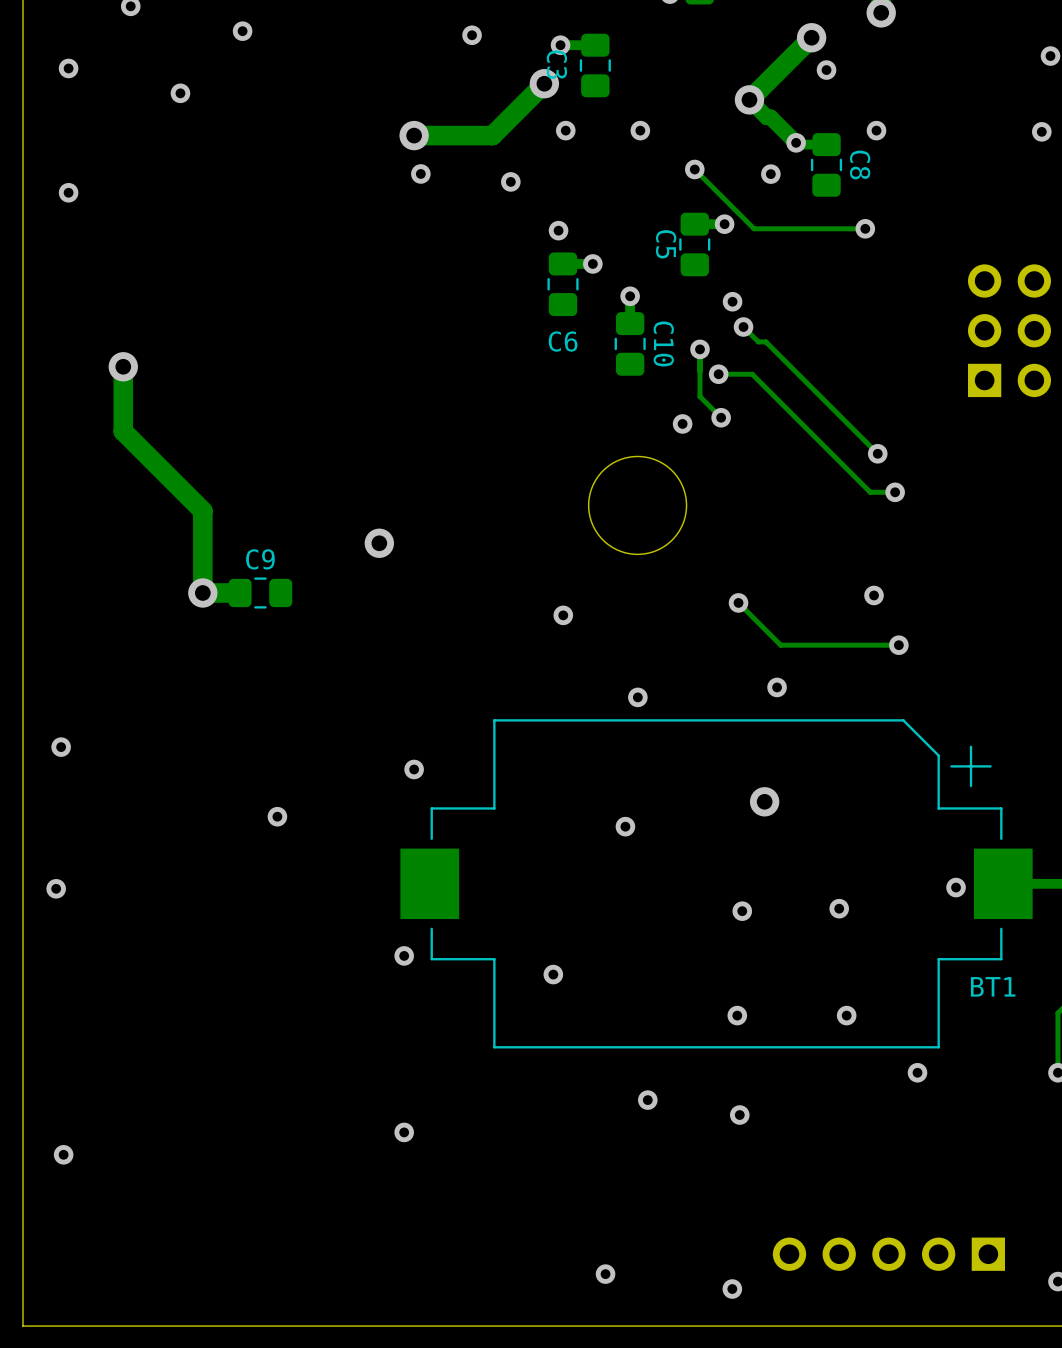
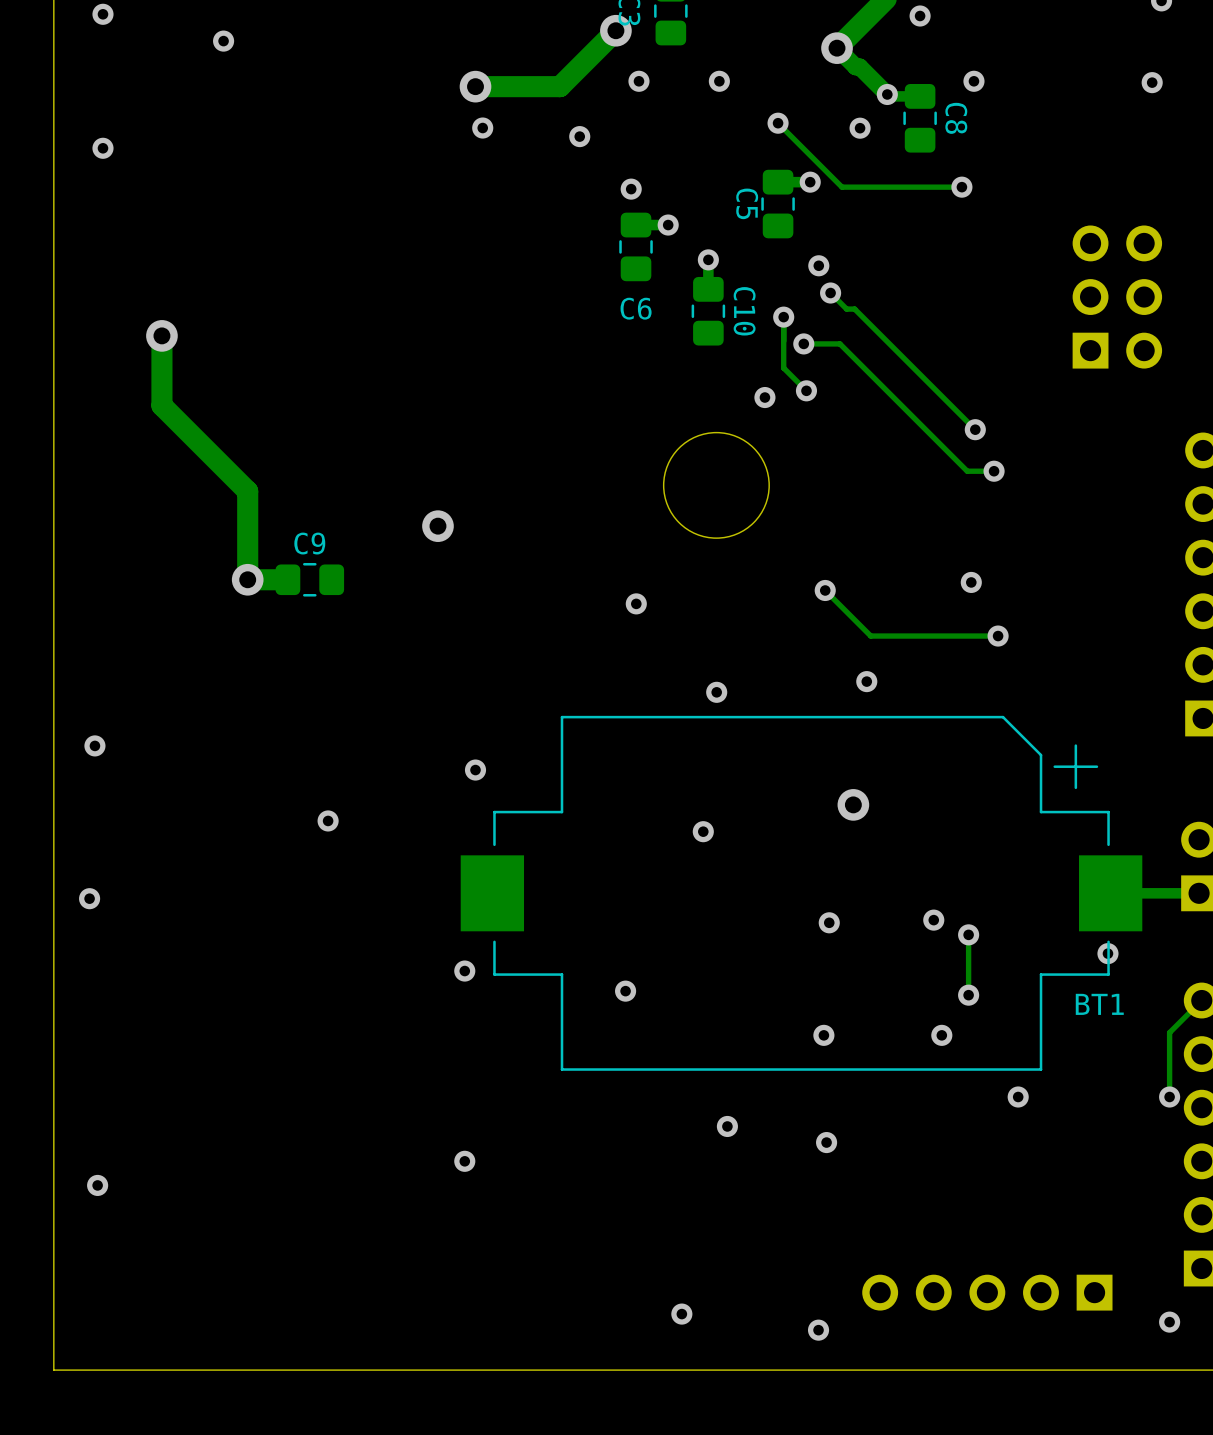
via: (956, 887) -> none
track: none -> (968, 934) (968, 995)
via: none -> (968, 934)
via: none -> (1107, 953)
via: none -> (968, 995)

